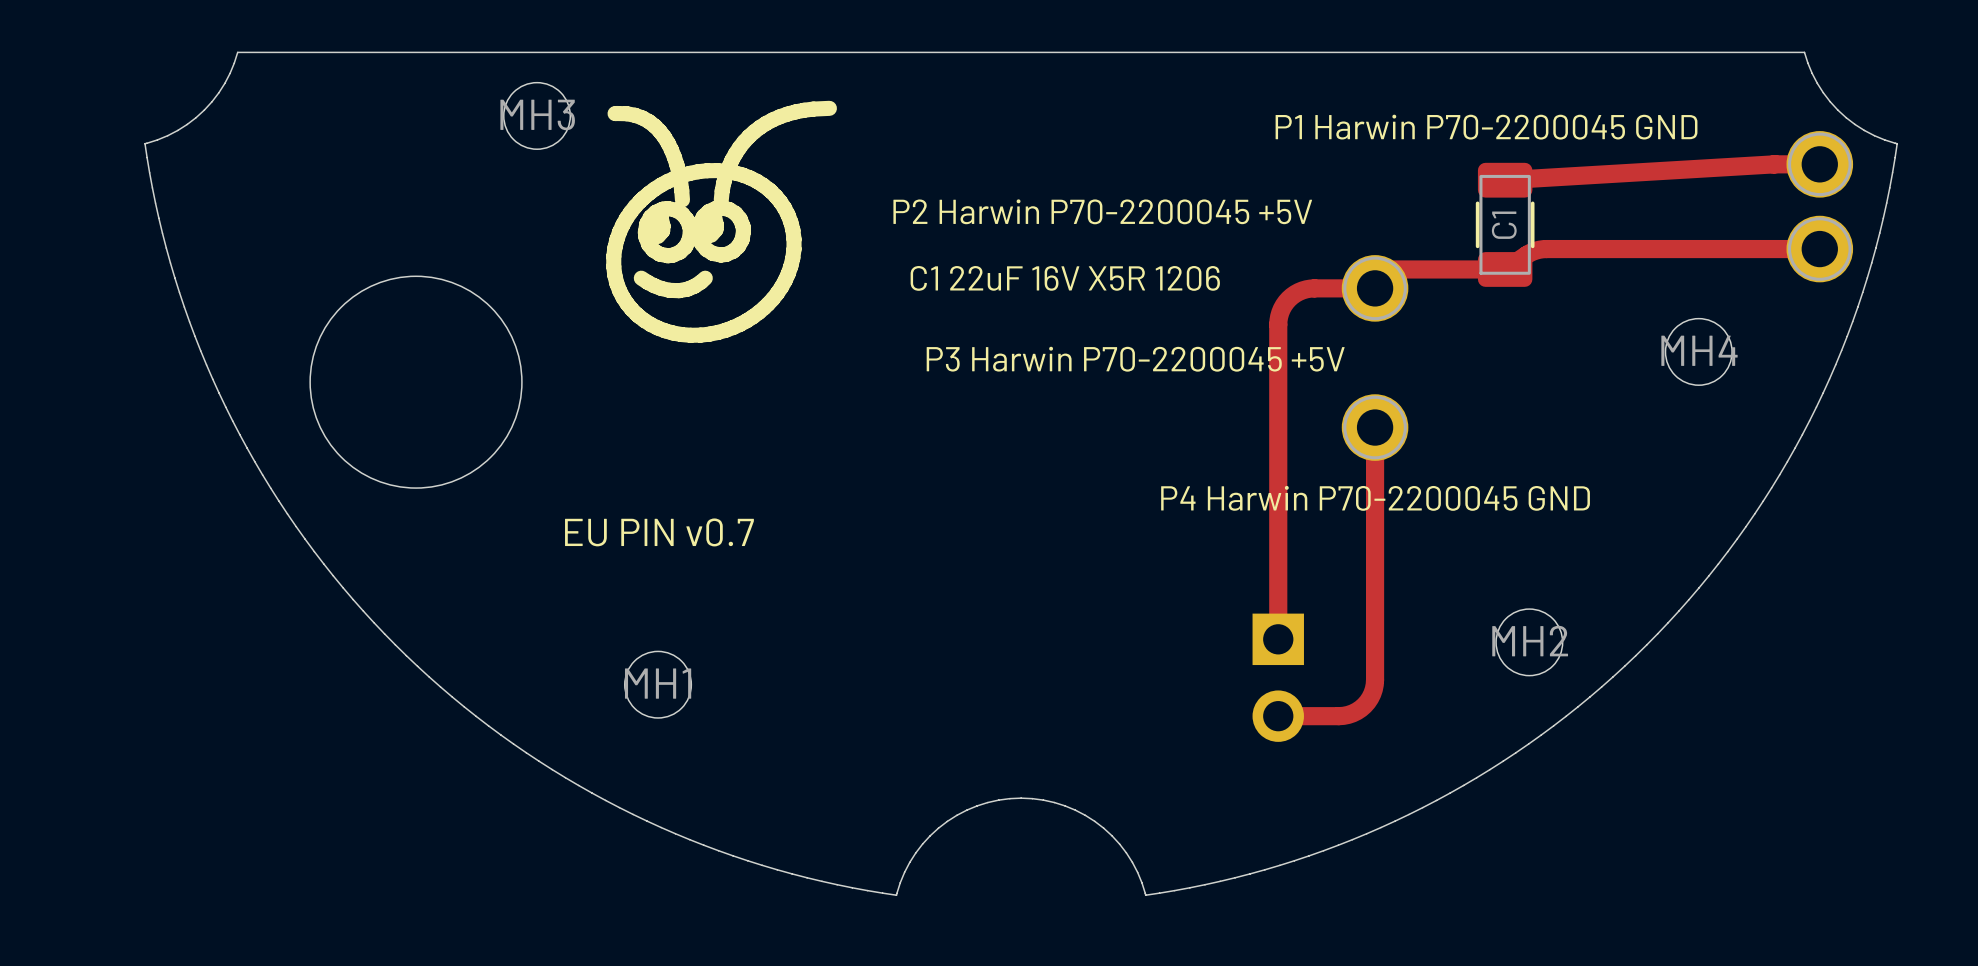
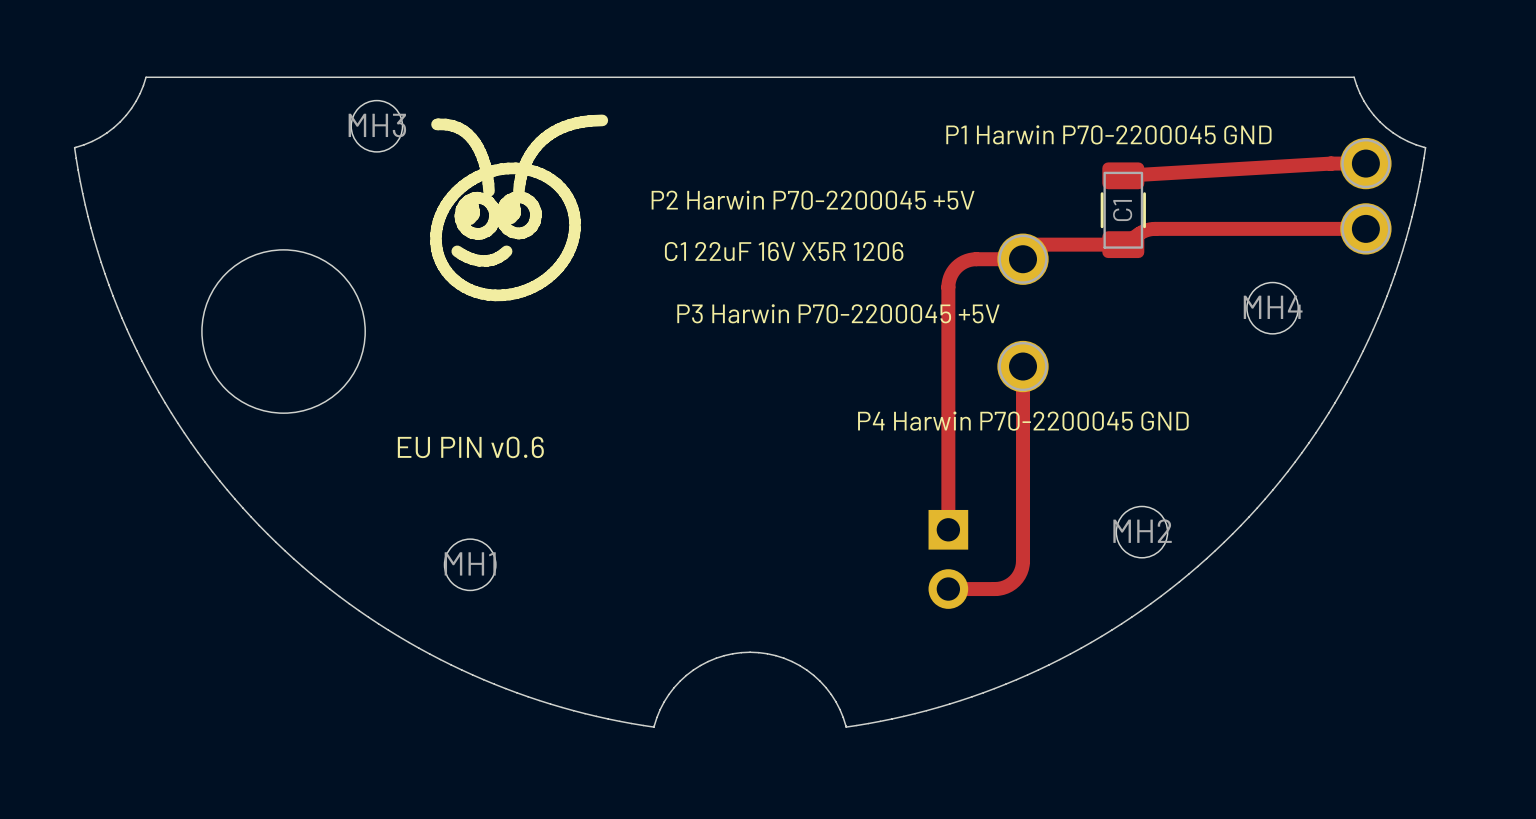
text: EU PIN v0.7 (659, 532) -> EU PIN v0.6 (470, 447)

